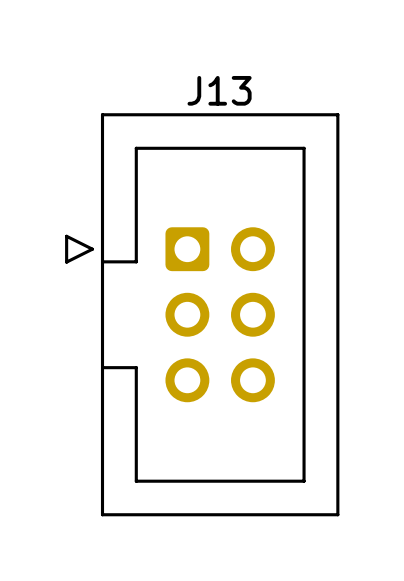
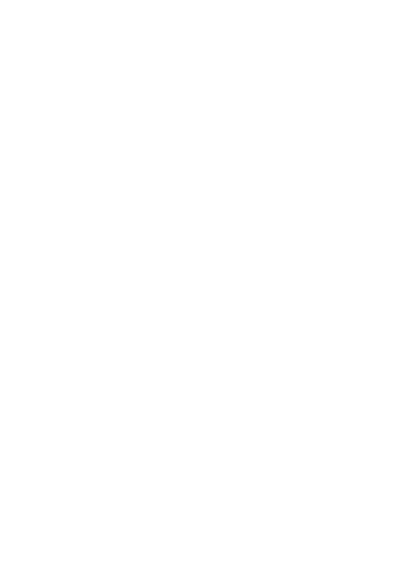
J13: (202, 314) -> none

